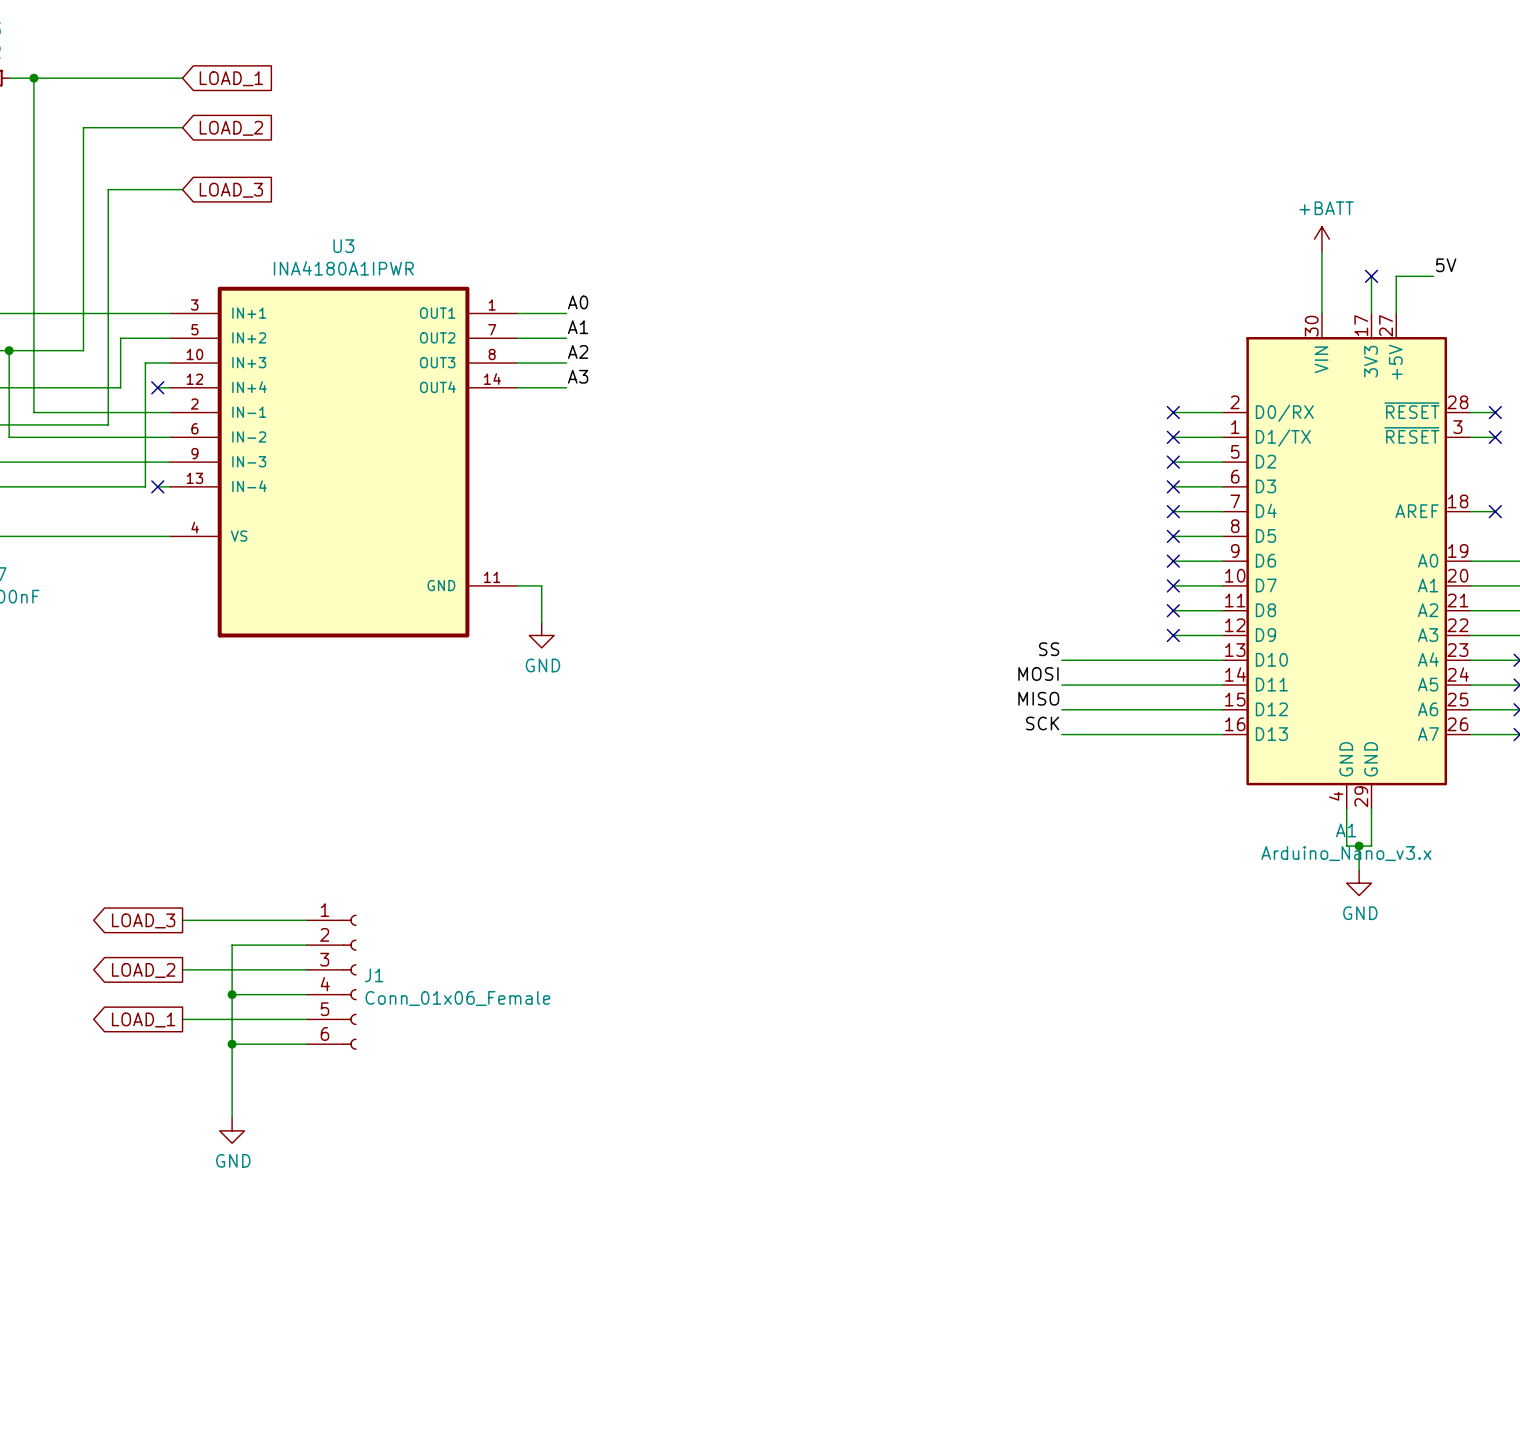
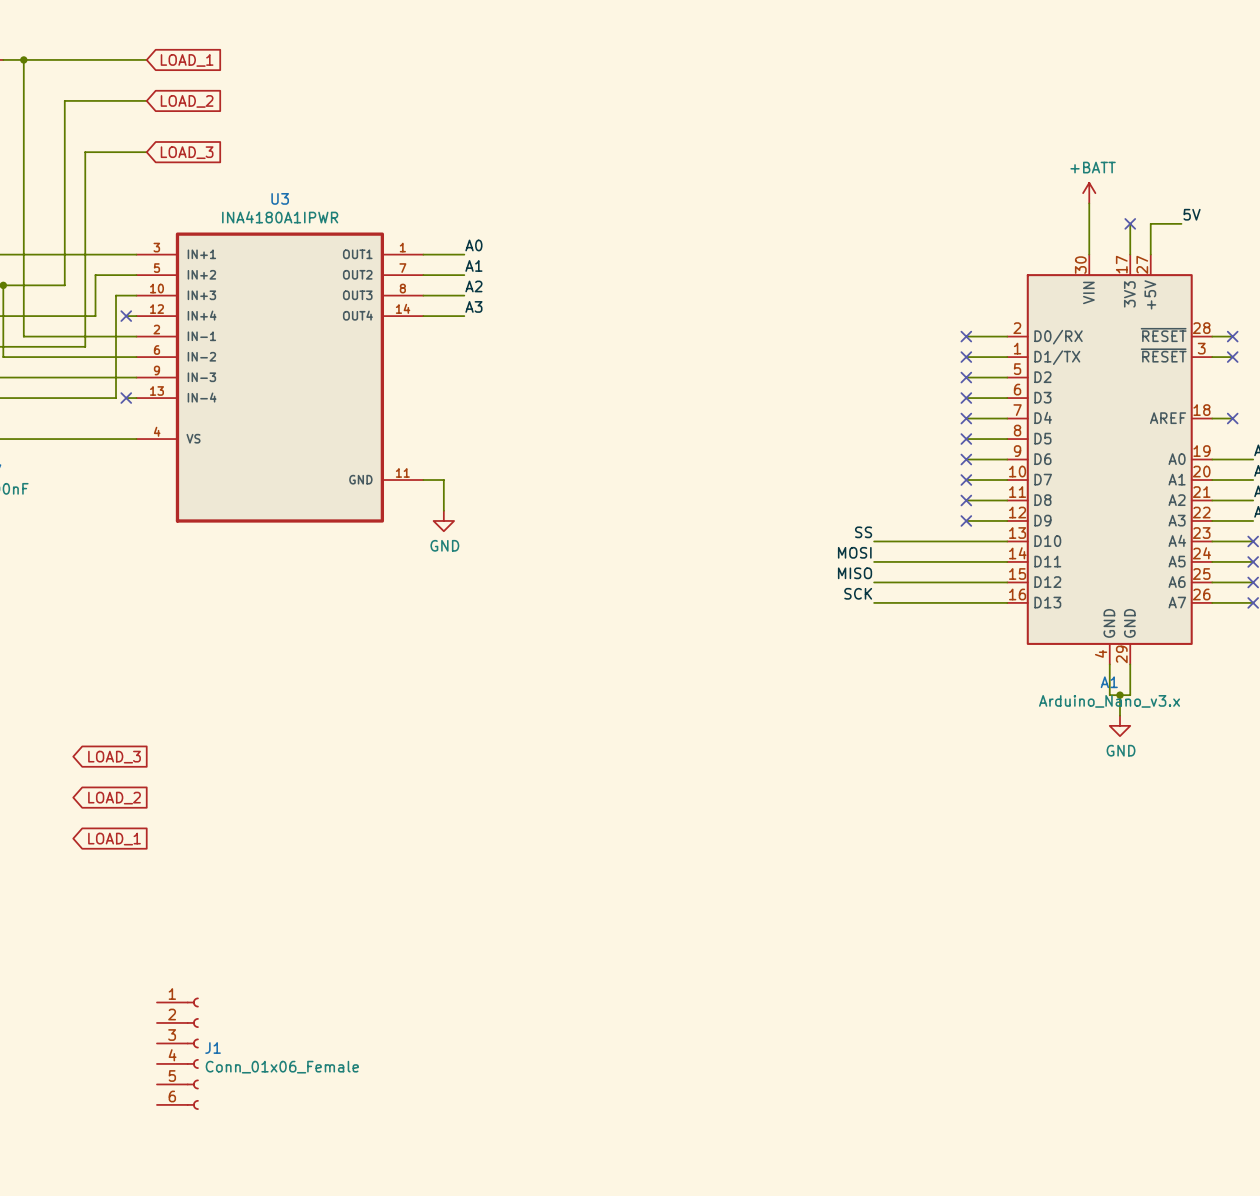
wire: (182, 920) (306, 920) -> none
wire: (306, 945) (232, 945) (232, 1118) -> none
wire: (182, 969) (306, 969) -> none
J1 position: (331, 982) -> (177, 1053)
wire: (232, 994) (306, 994) -> none
junction: (232, 994) -> none
wire: (182, 1019) (306, 1019) -> none
wire: (232, 1044) (306, 1044) -> none
junction: (232, 1044) -> none
power symbol: GND (232, 1130) -> none

